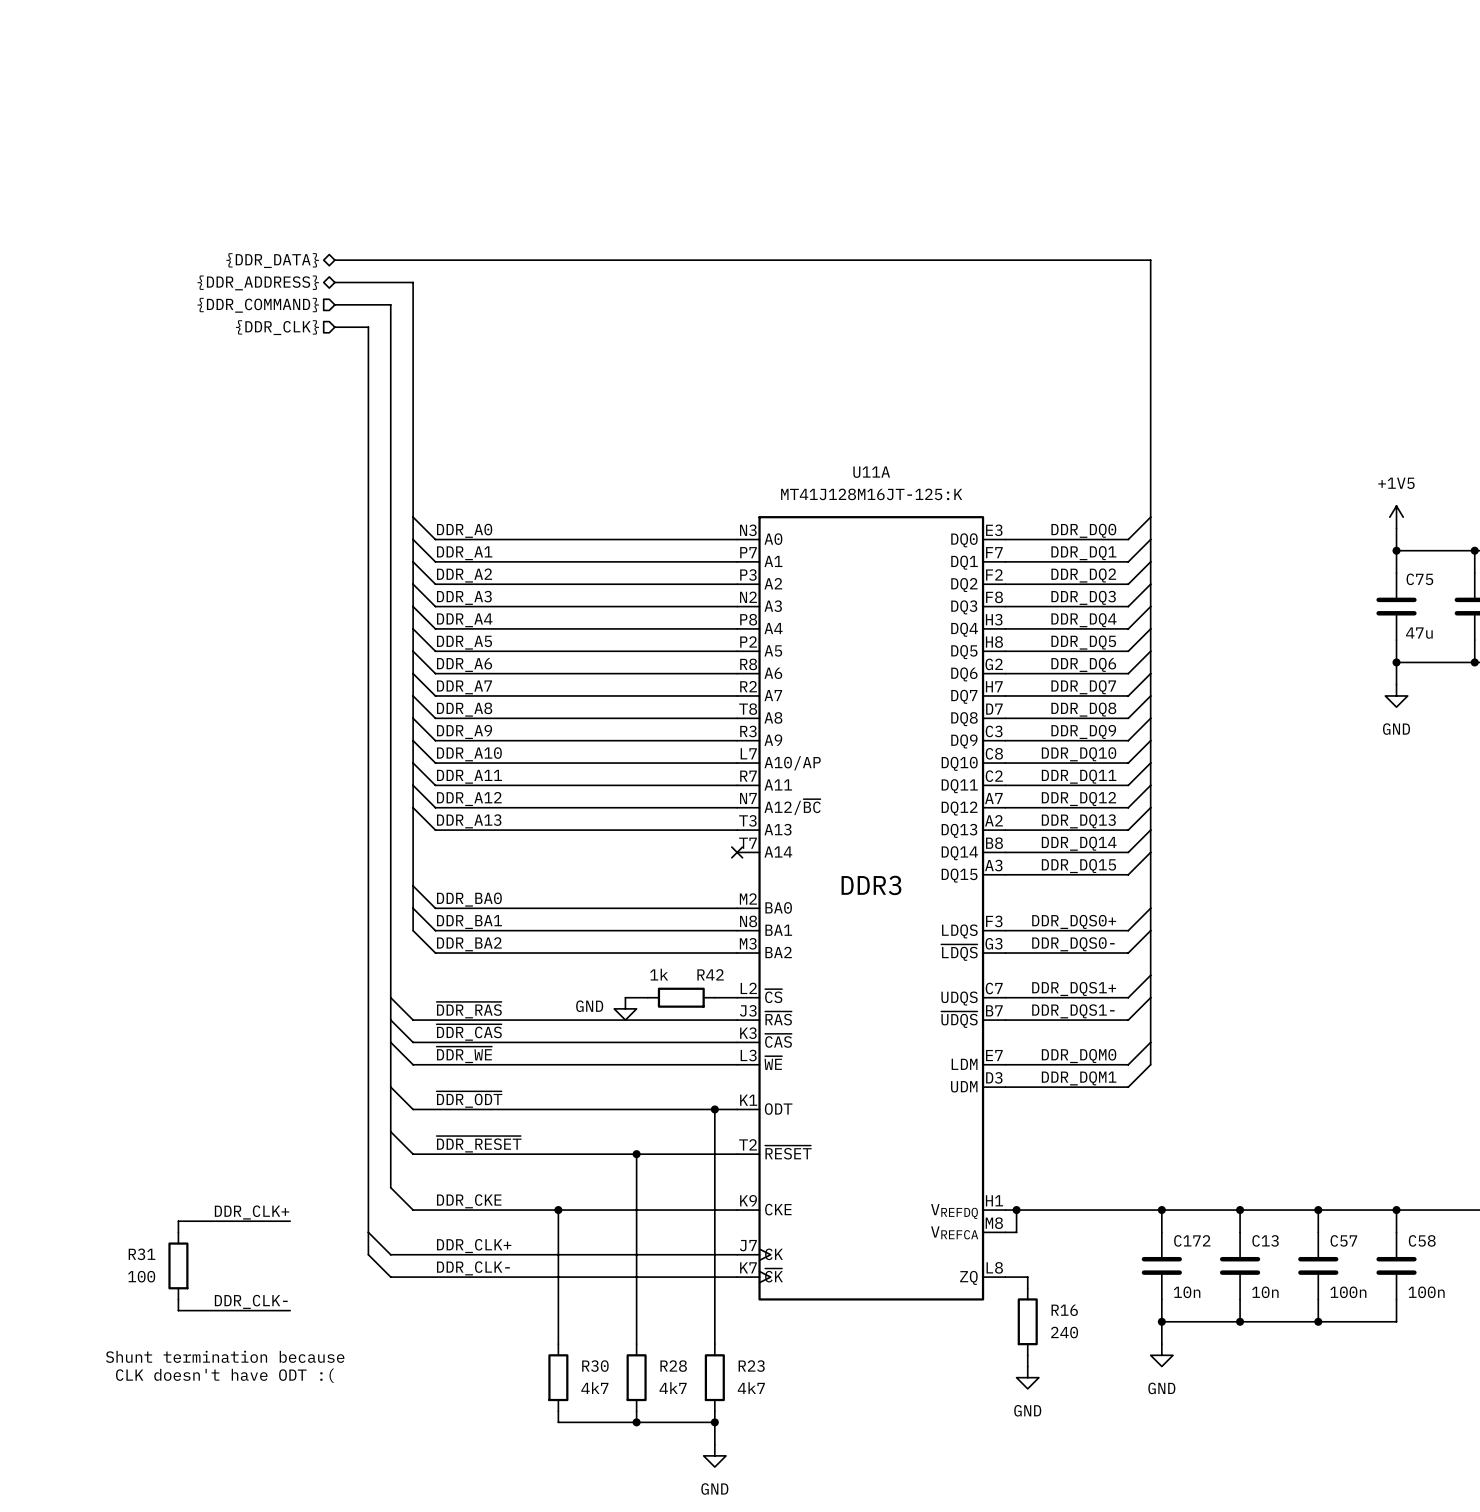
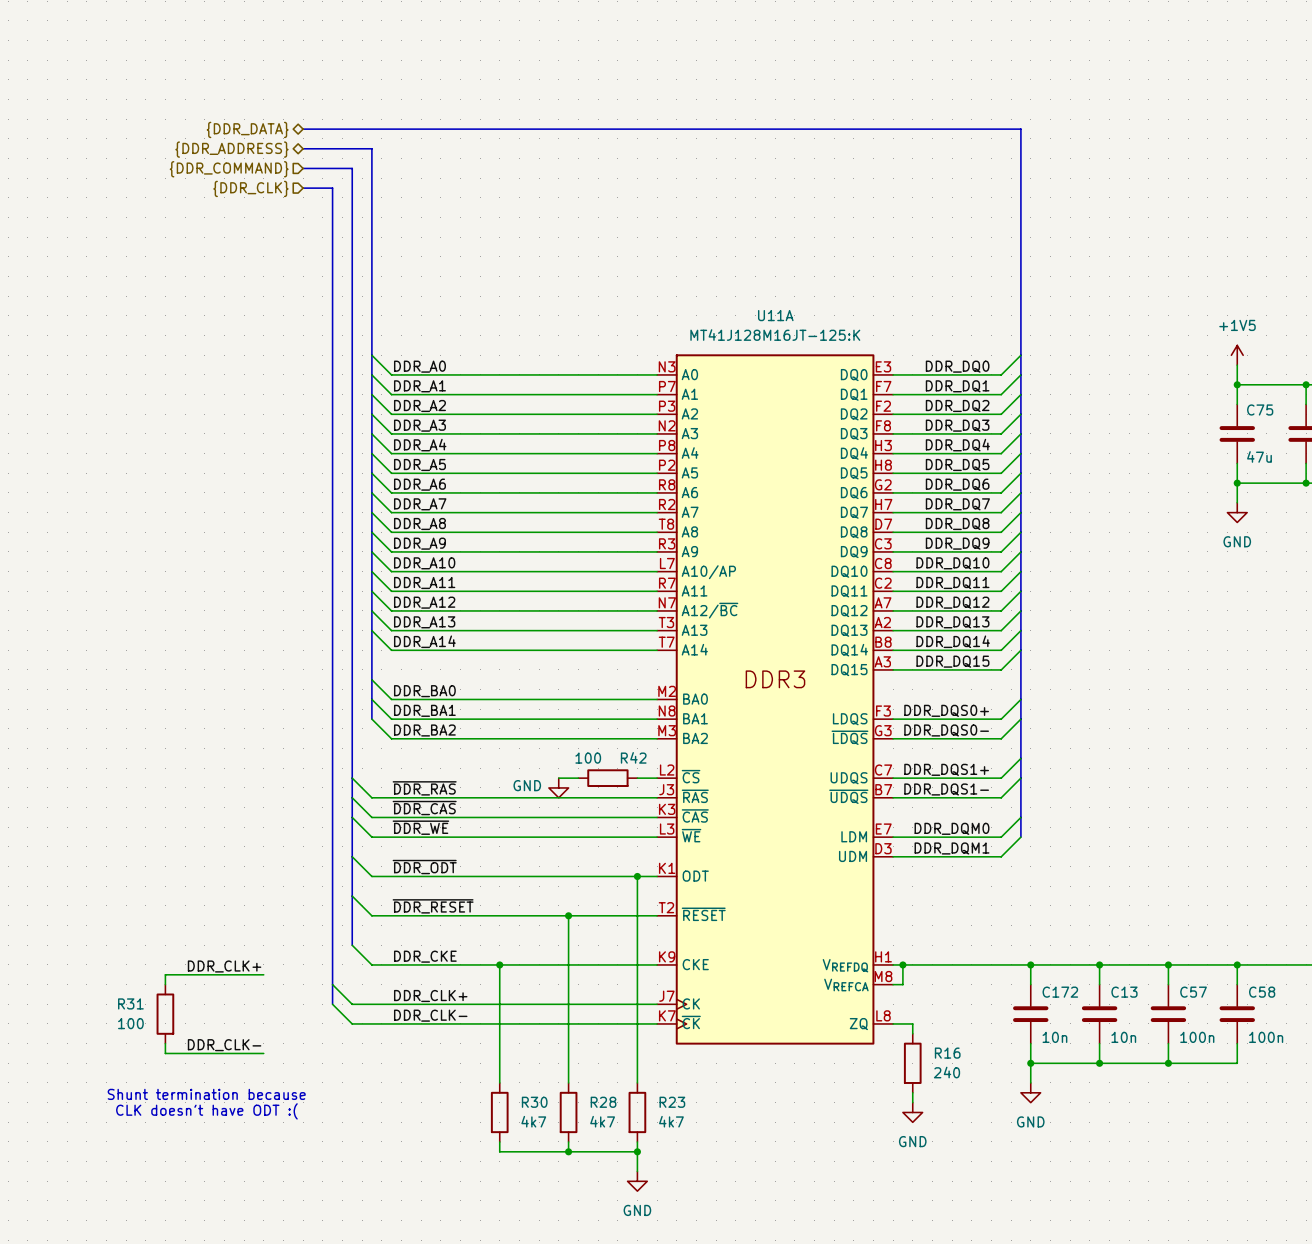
wire: none -> (371, 630) (391, 650) (657, 650)
label: none -> DDR_A14 (424, 641)
no-connect mark: (737, 852) -> none
R42 value: 1k (659, 974) -> 100 (588, 758)

